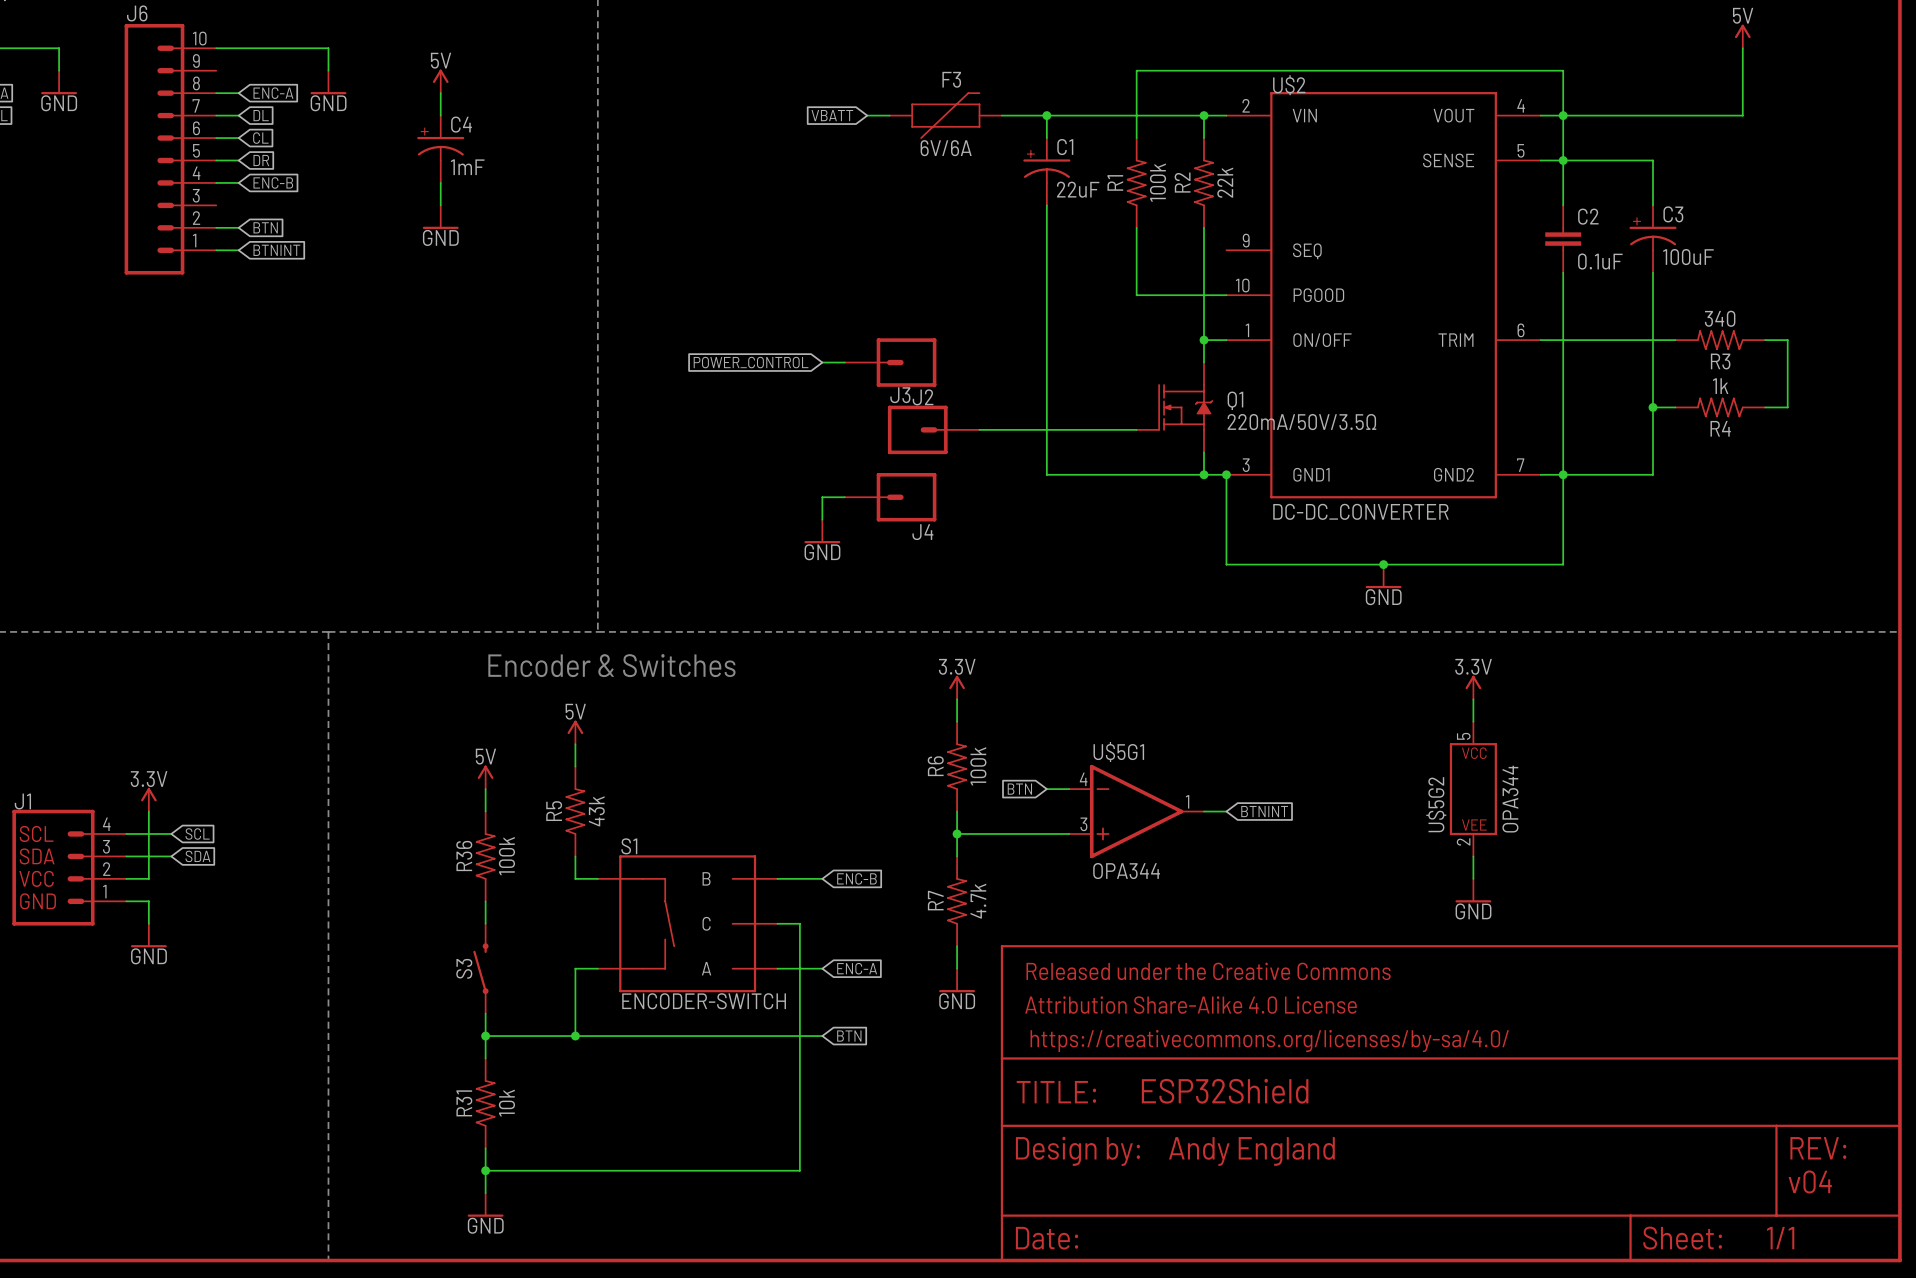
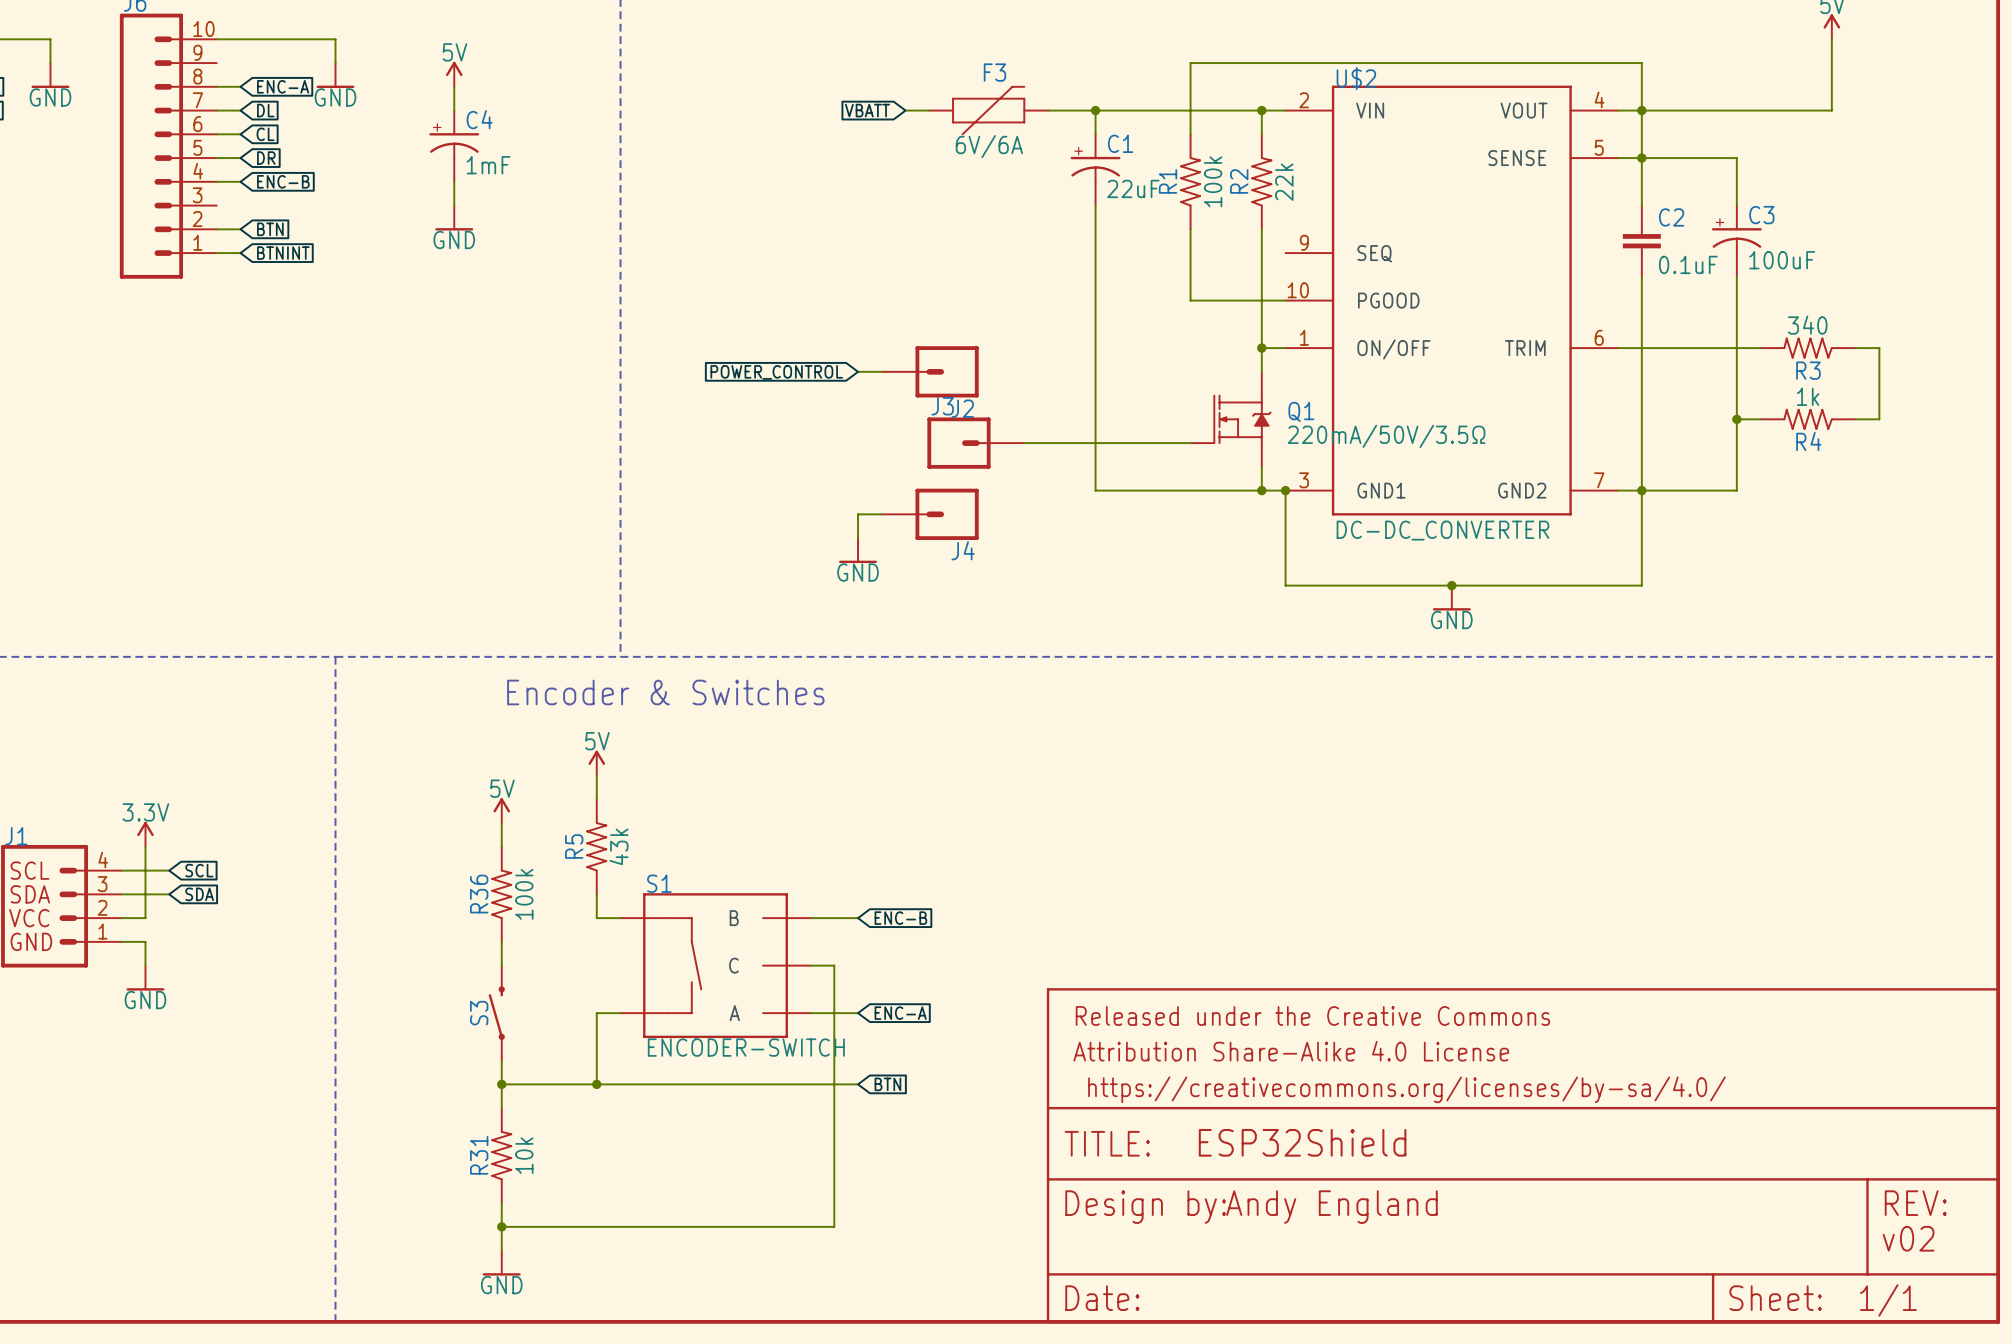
power symbol: 3.3V (957, 687) -> none
power symbol: 3.3V (1473, 687) -> none
wire: (957, 699) (957, 721) -> none
wire: (1473, 699) (1473, 721) -> none
R6: 100k (957, 766) -> none
global label: BTN (1019, 789) -> none
wire: (1046, 789) (1069, 789) -> none
U$5G2: OPA344 (1473, 789) -> none
wire: (957, 811) (957, 856) -> none
U$5G1: OPA344 (1136, 811) -> none
wire: (1204, 811) (1226, 811) -> none
global label: BTNINT (1264, 811) -> none
wire: (957, 833) (1069, 833) -> none
junction: (957, 833) -> none
wire: (1473, 856) (1473, 878) -> none
power symbol: GND (1473, 890) -> none
R7: 4.7k (957, 901) -> none
wire: (957, 946) (957, 968) -> none
power symbol: GND (957, 980) -> none
text: v04 (1810, 1181) -> v02 (1908, 1238)

